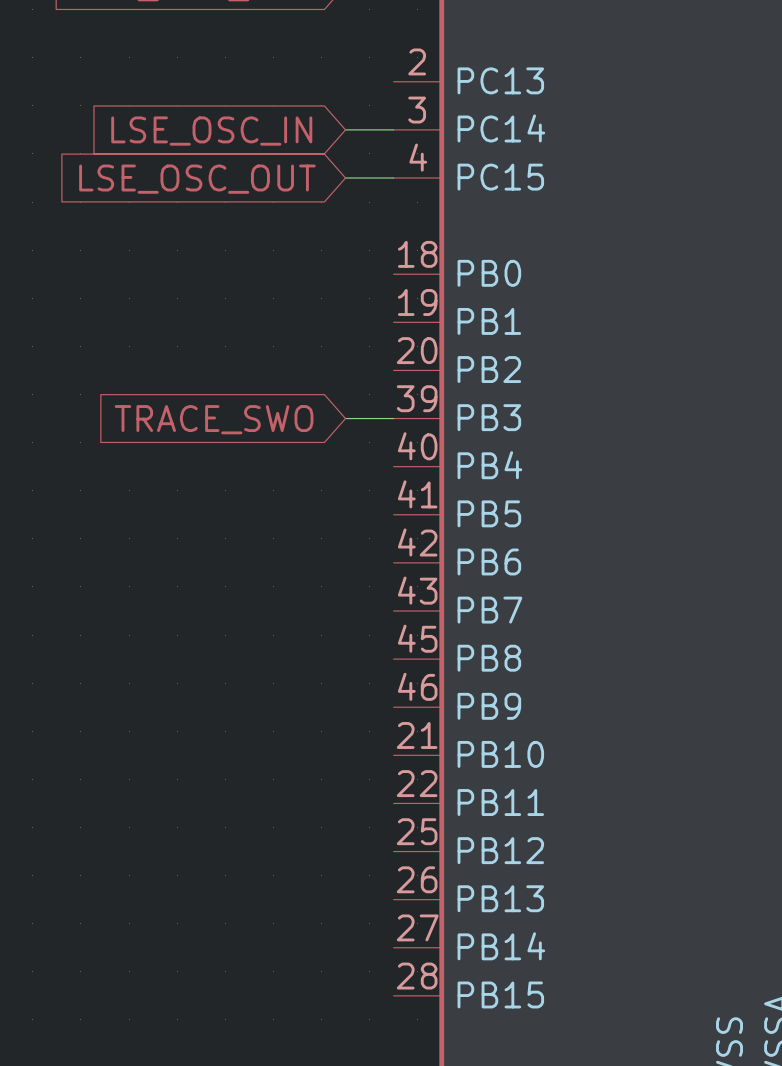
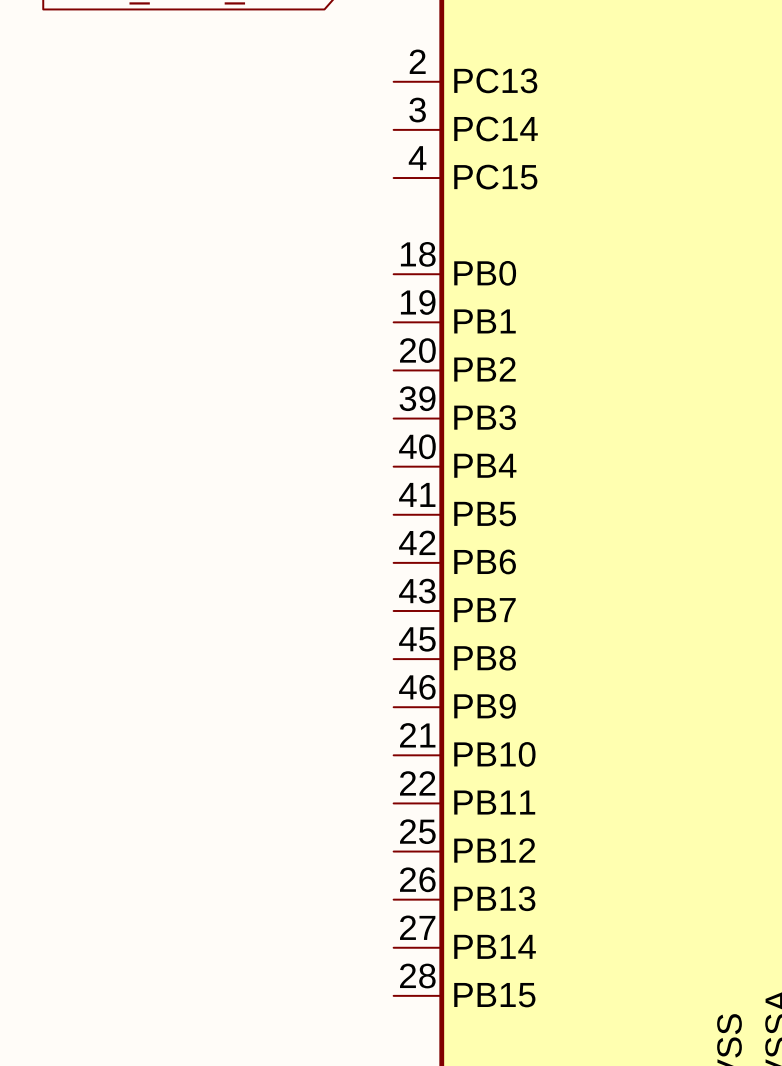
wire: (345, 129) (393, 129) -> none
global label: LSE_OSC_IN (211, 131) -> none
wire: (345, 178) (393, 178) -> none
global label: LSE_OSC_OUT (197, 179) -> none
wire: (345, 418) (393, 418) -> none
global label: TRACE_SWO (214, 419) -> none

